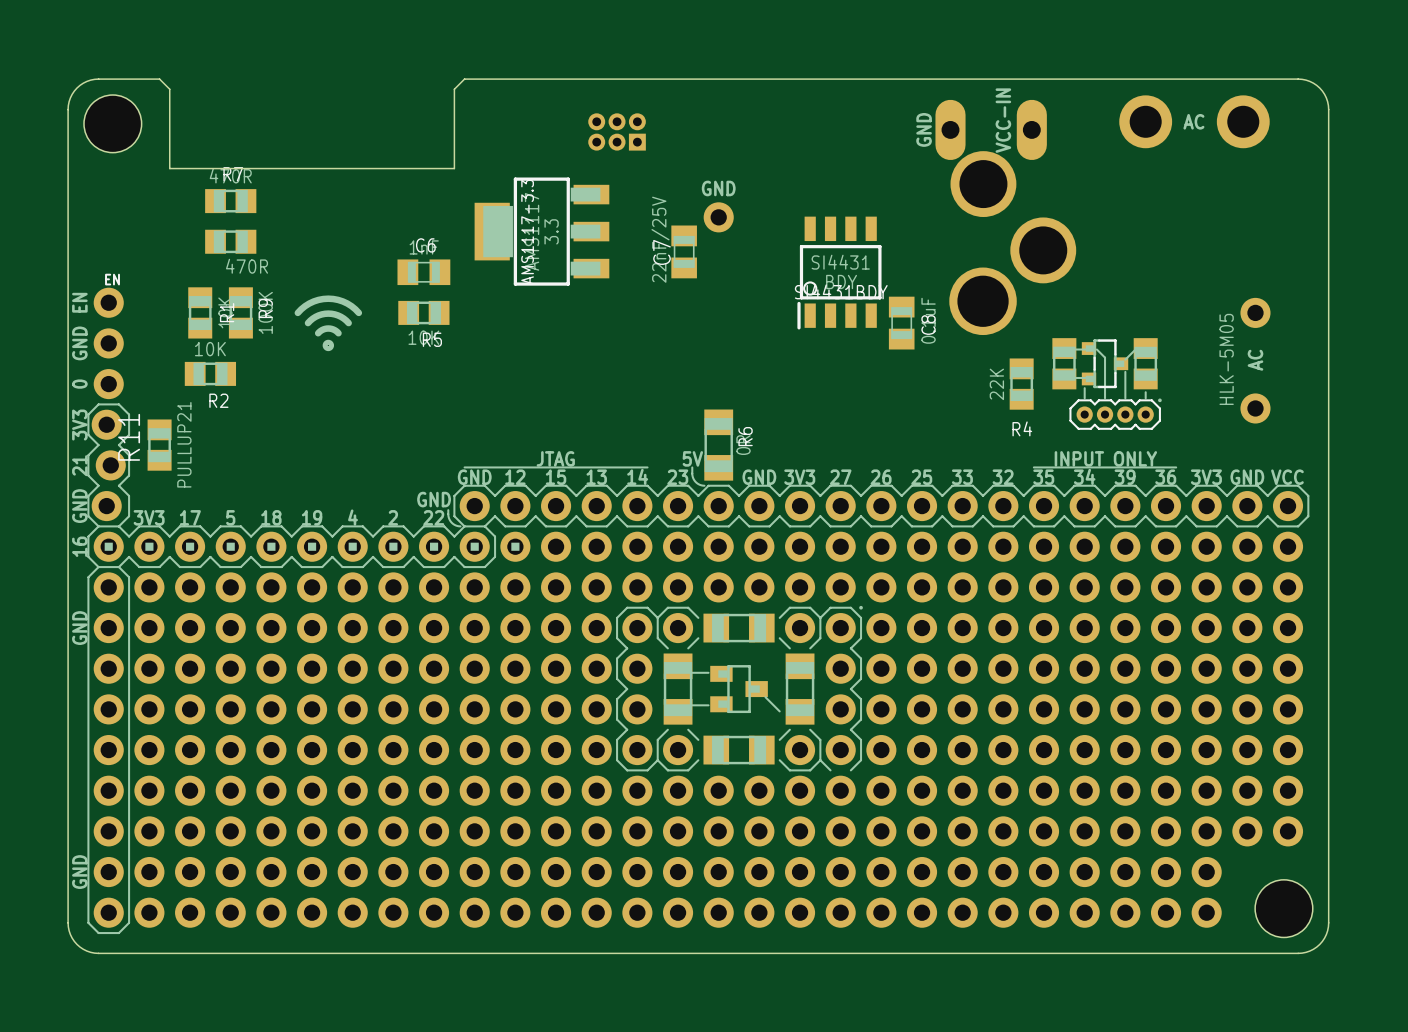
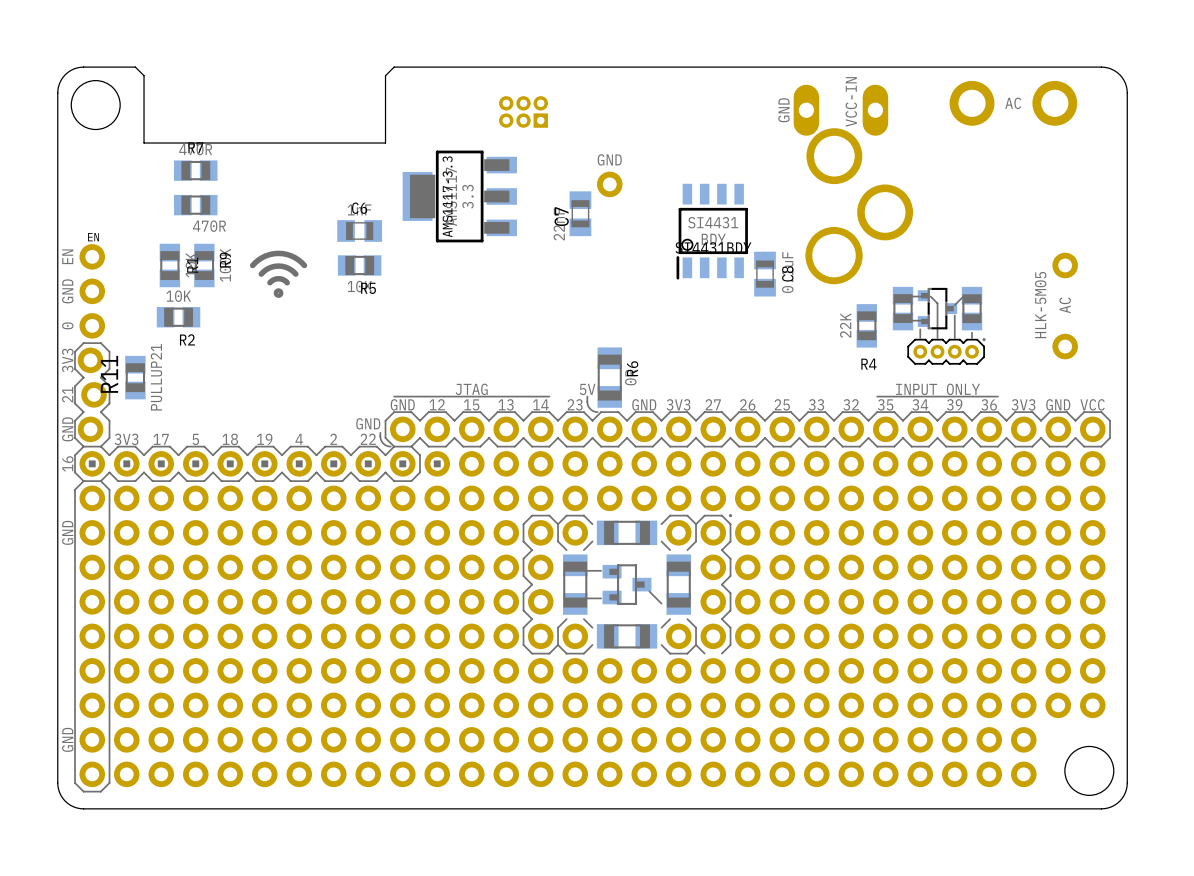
C7 value: 22nF/25V (660, 239) -> 22nF (559, 224)

